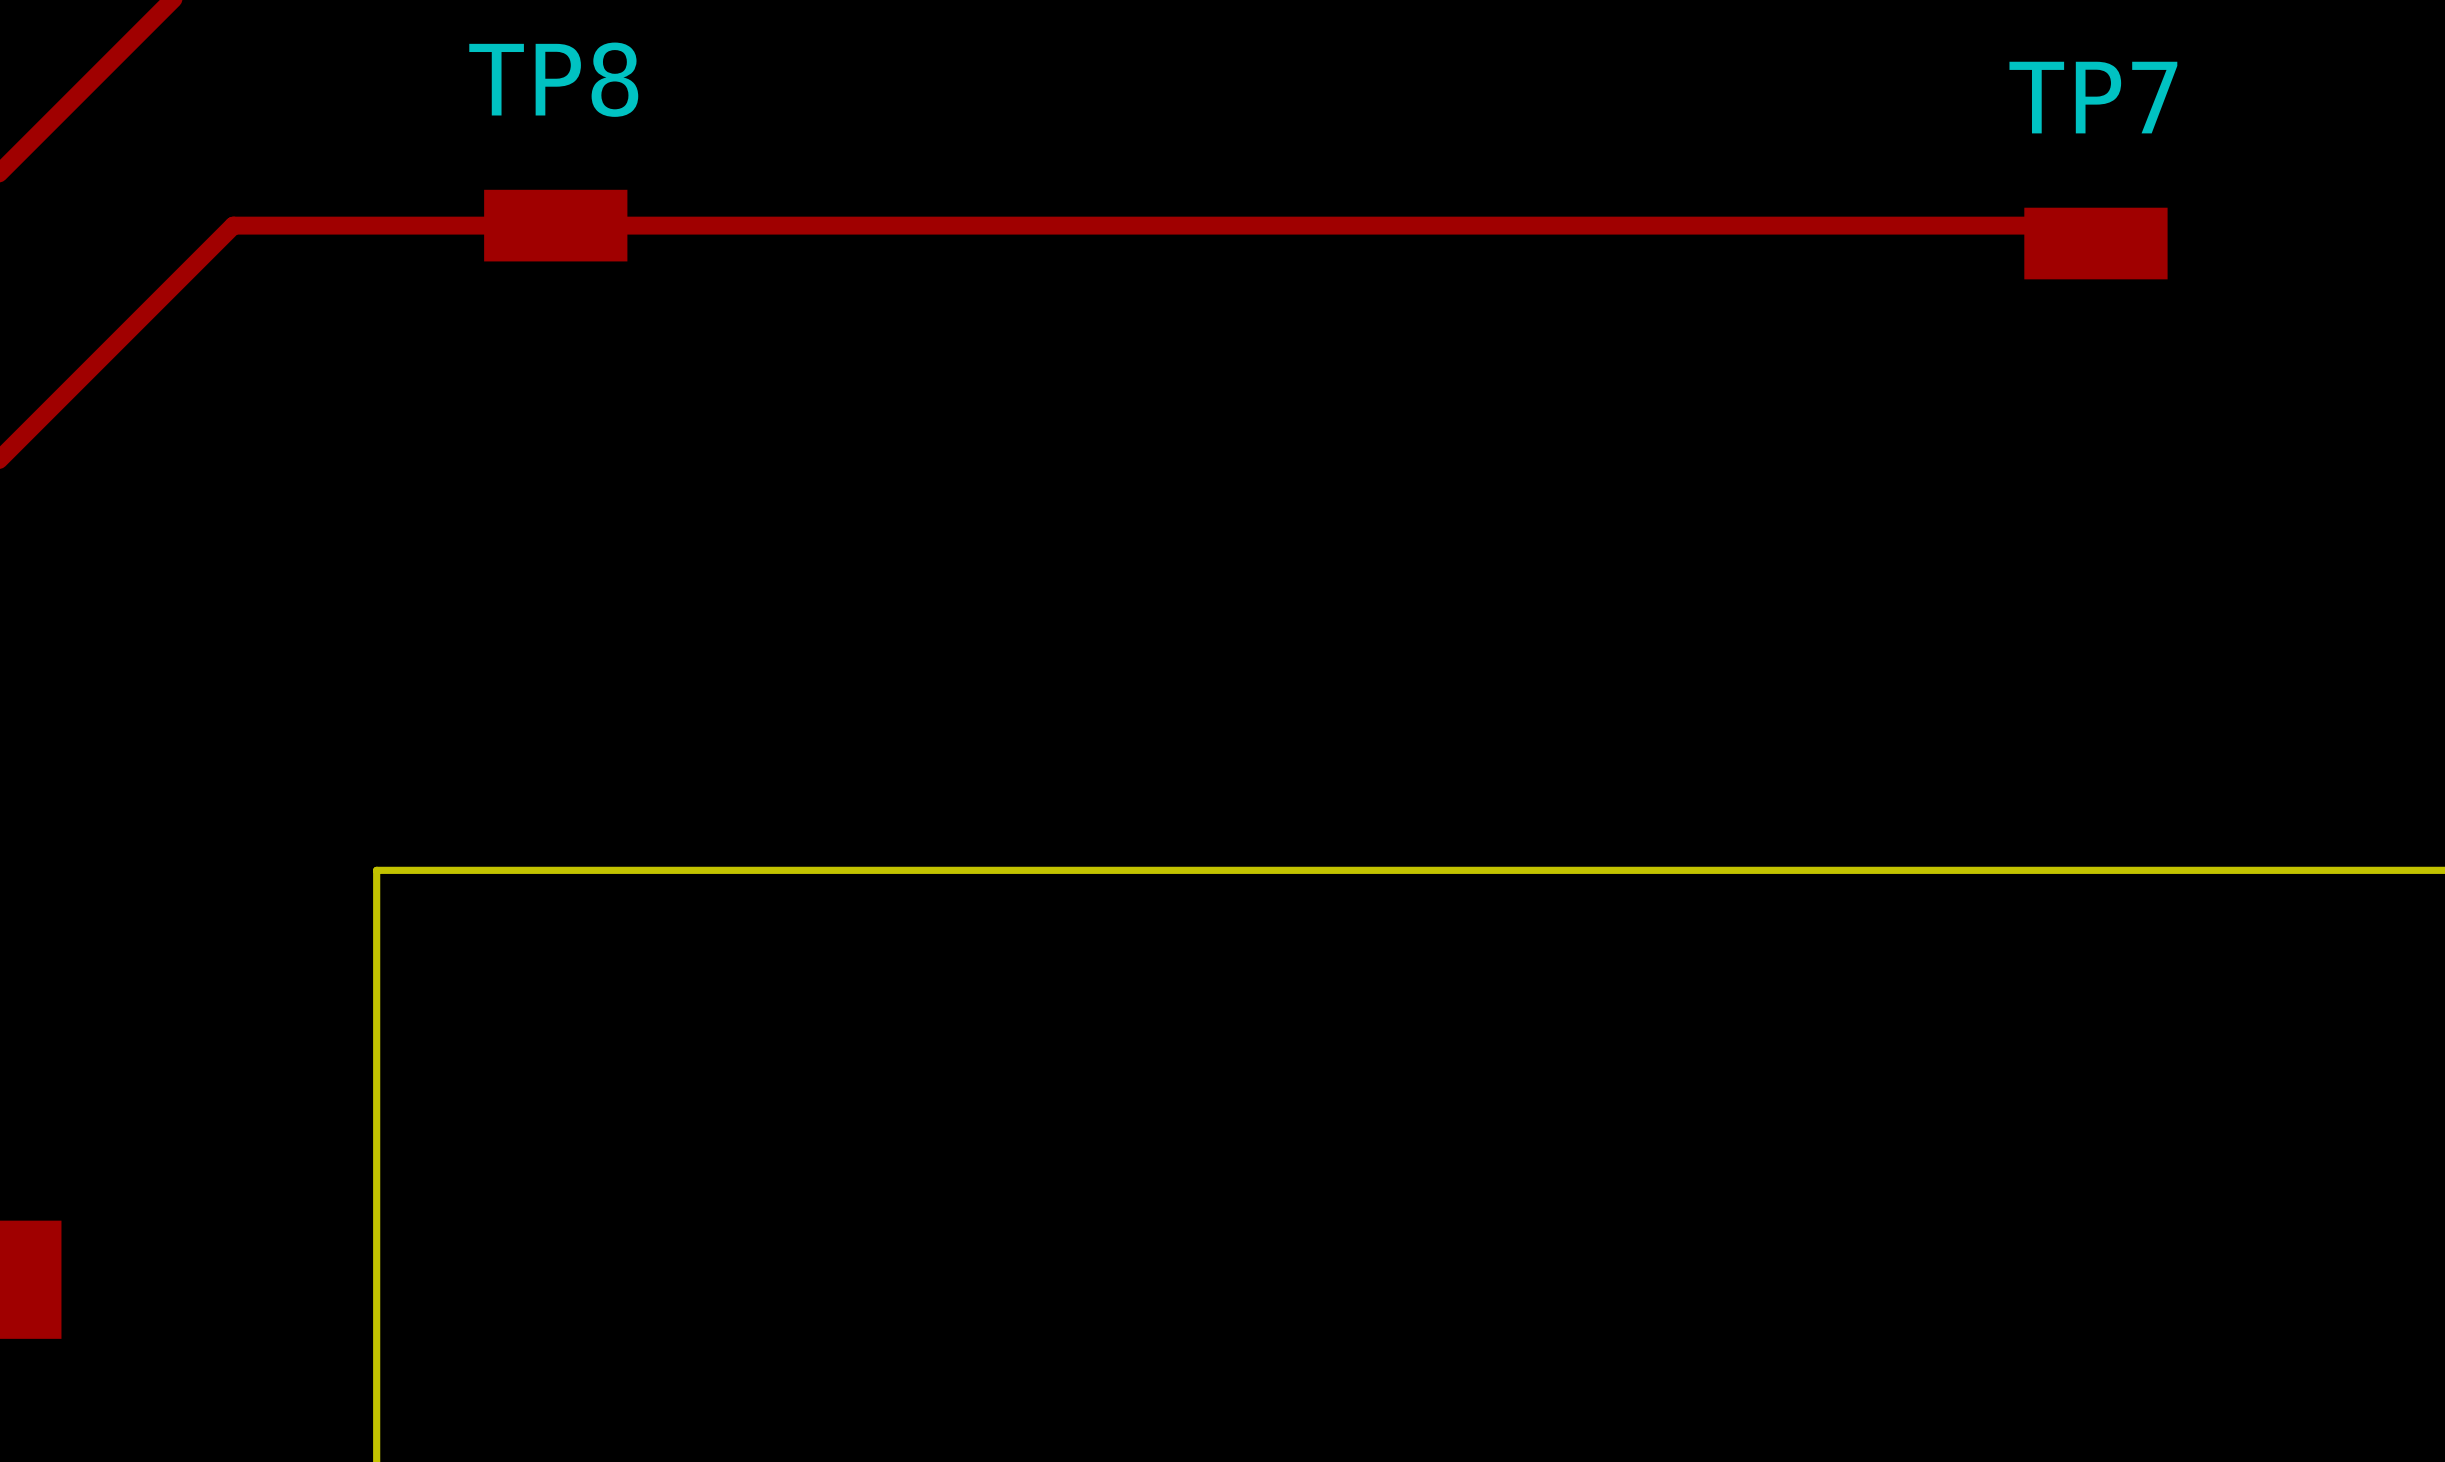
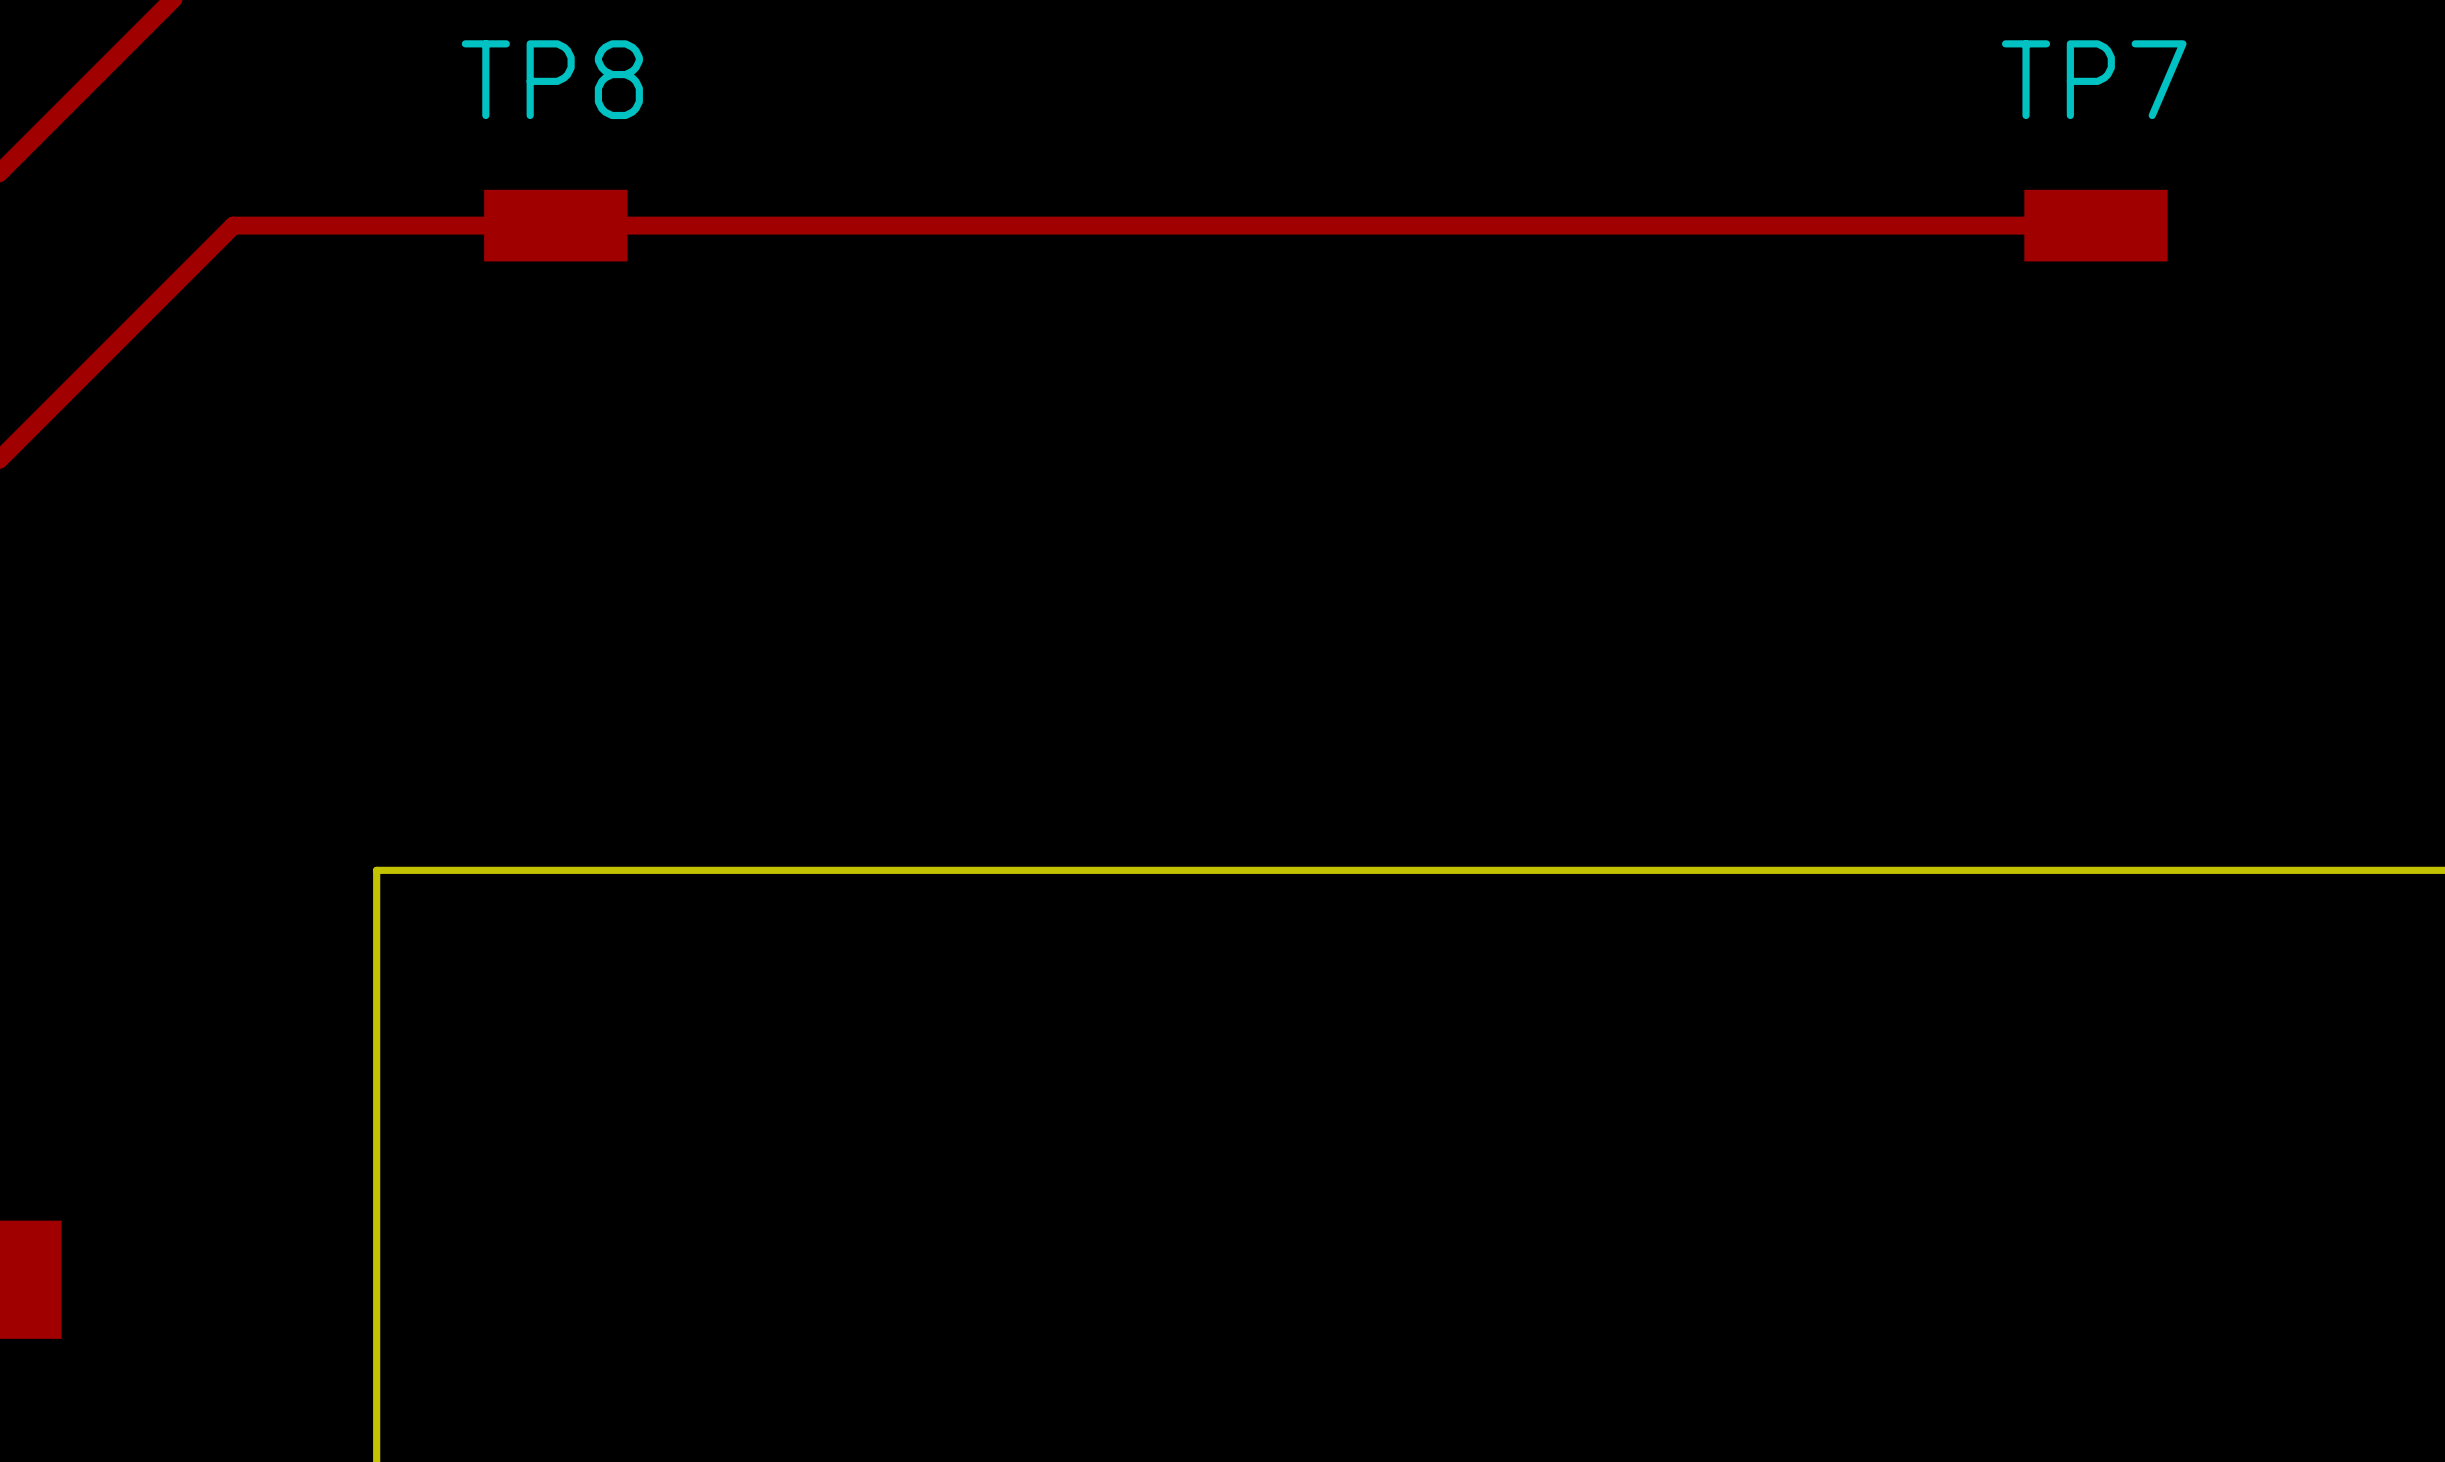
TP7 position: (2095, 243) -> (2095, 225)

